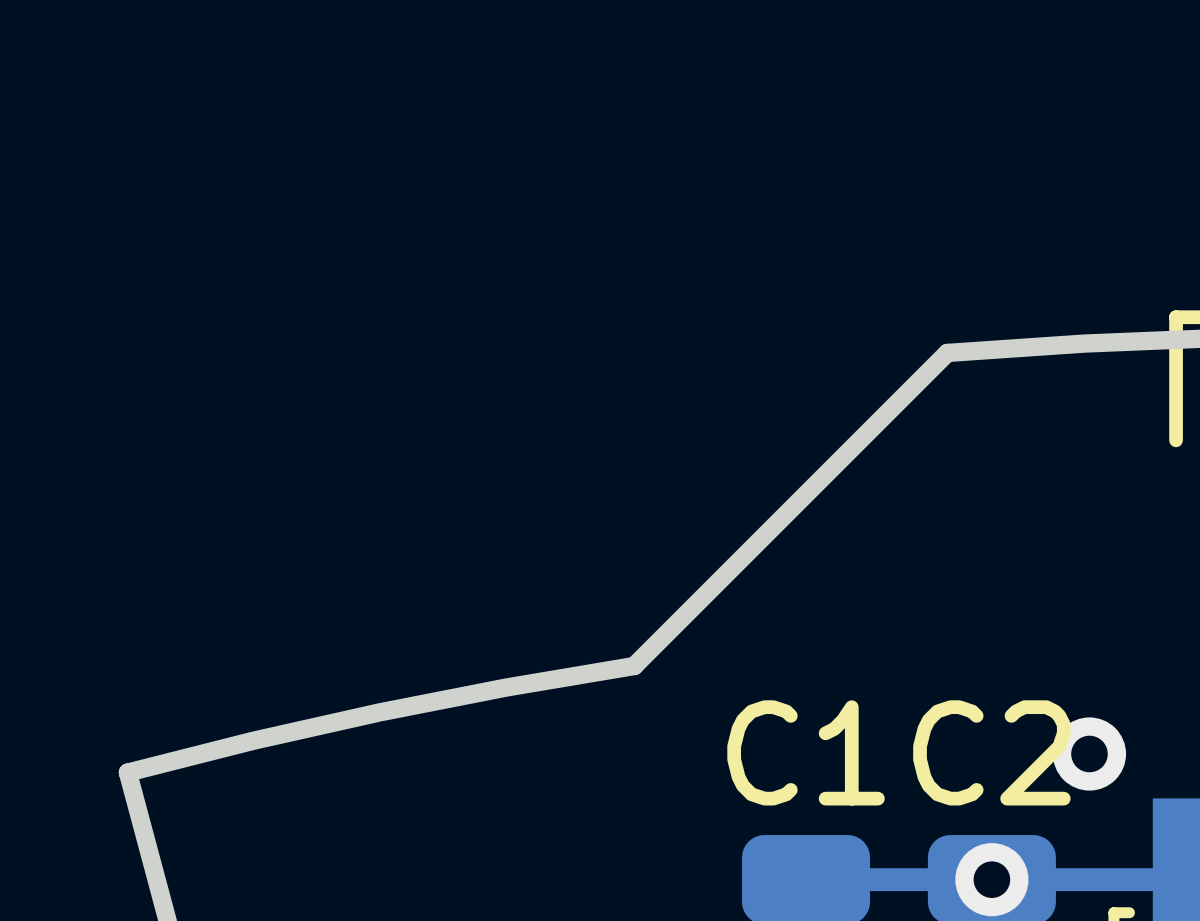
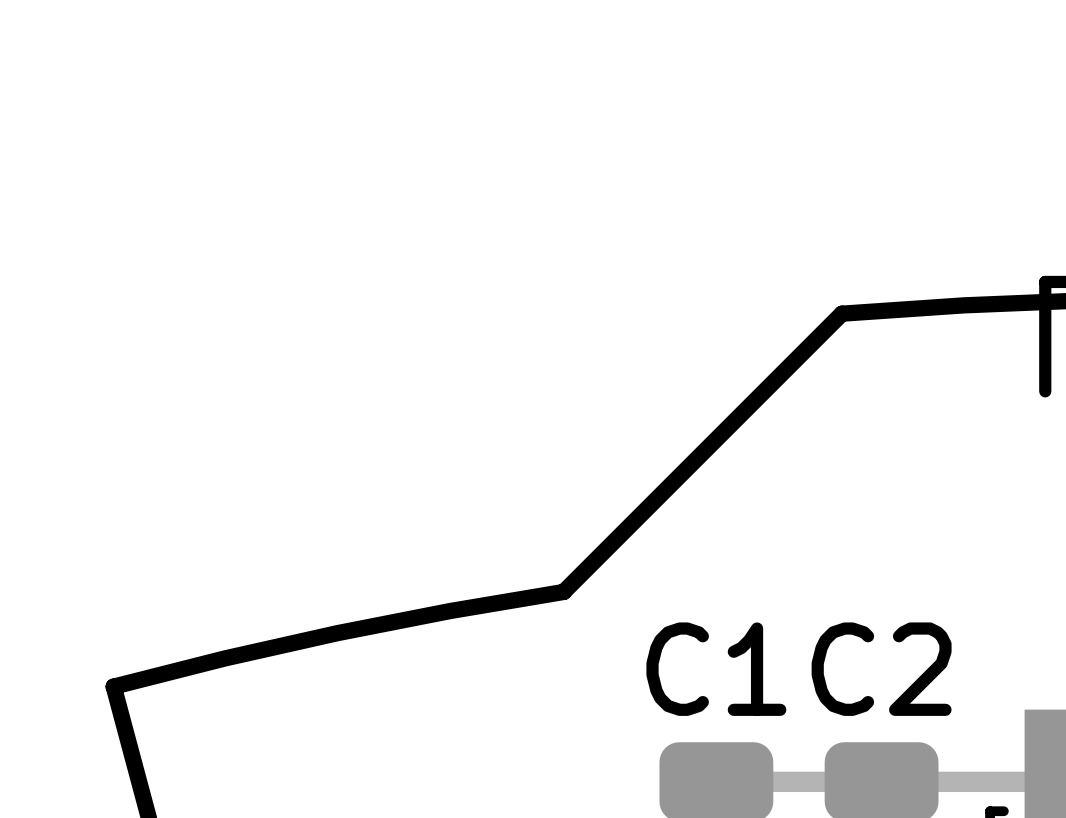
via: (1089, 754) -> none
via: (991, 879) -> none

